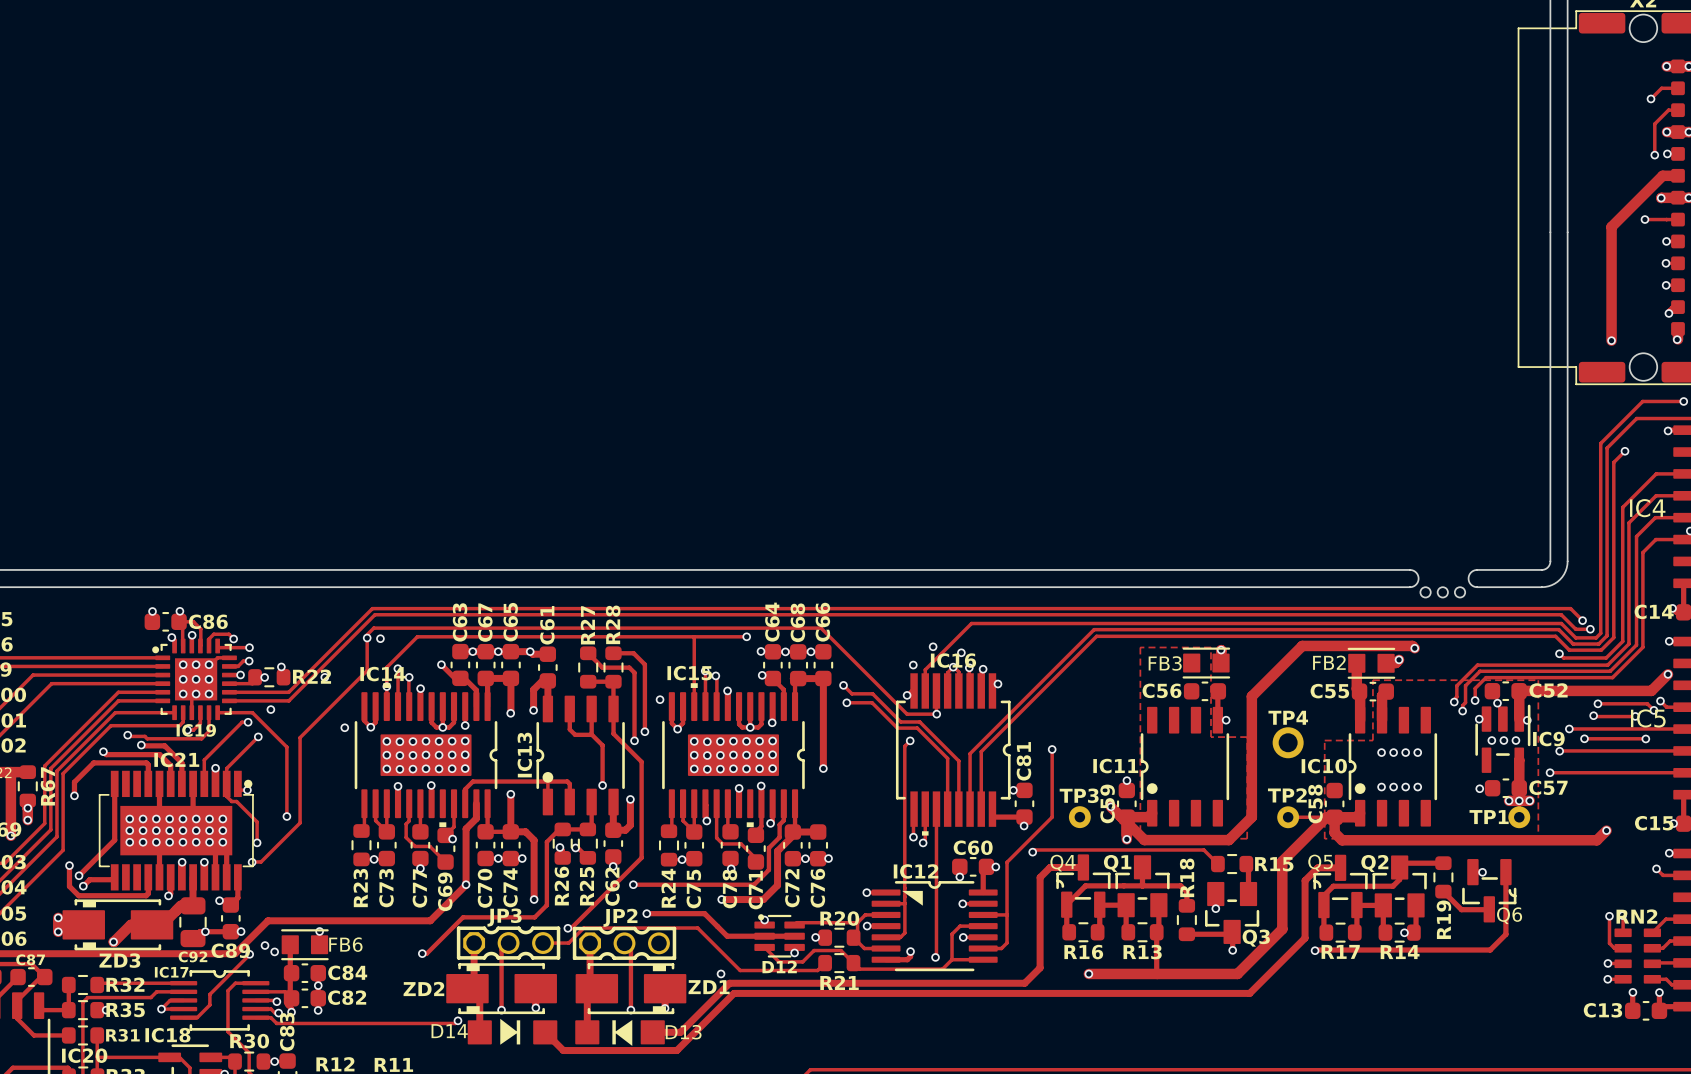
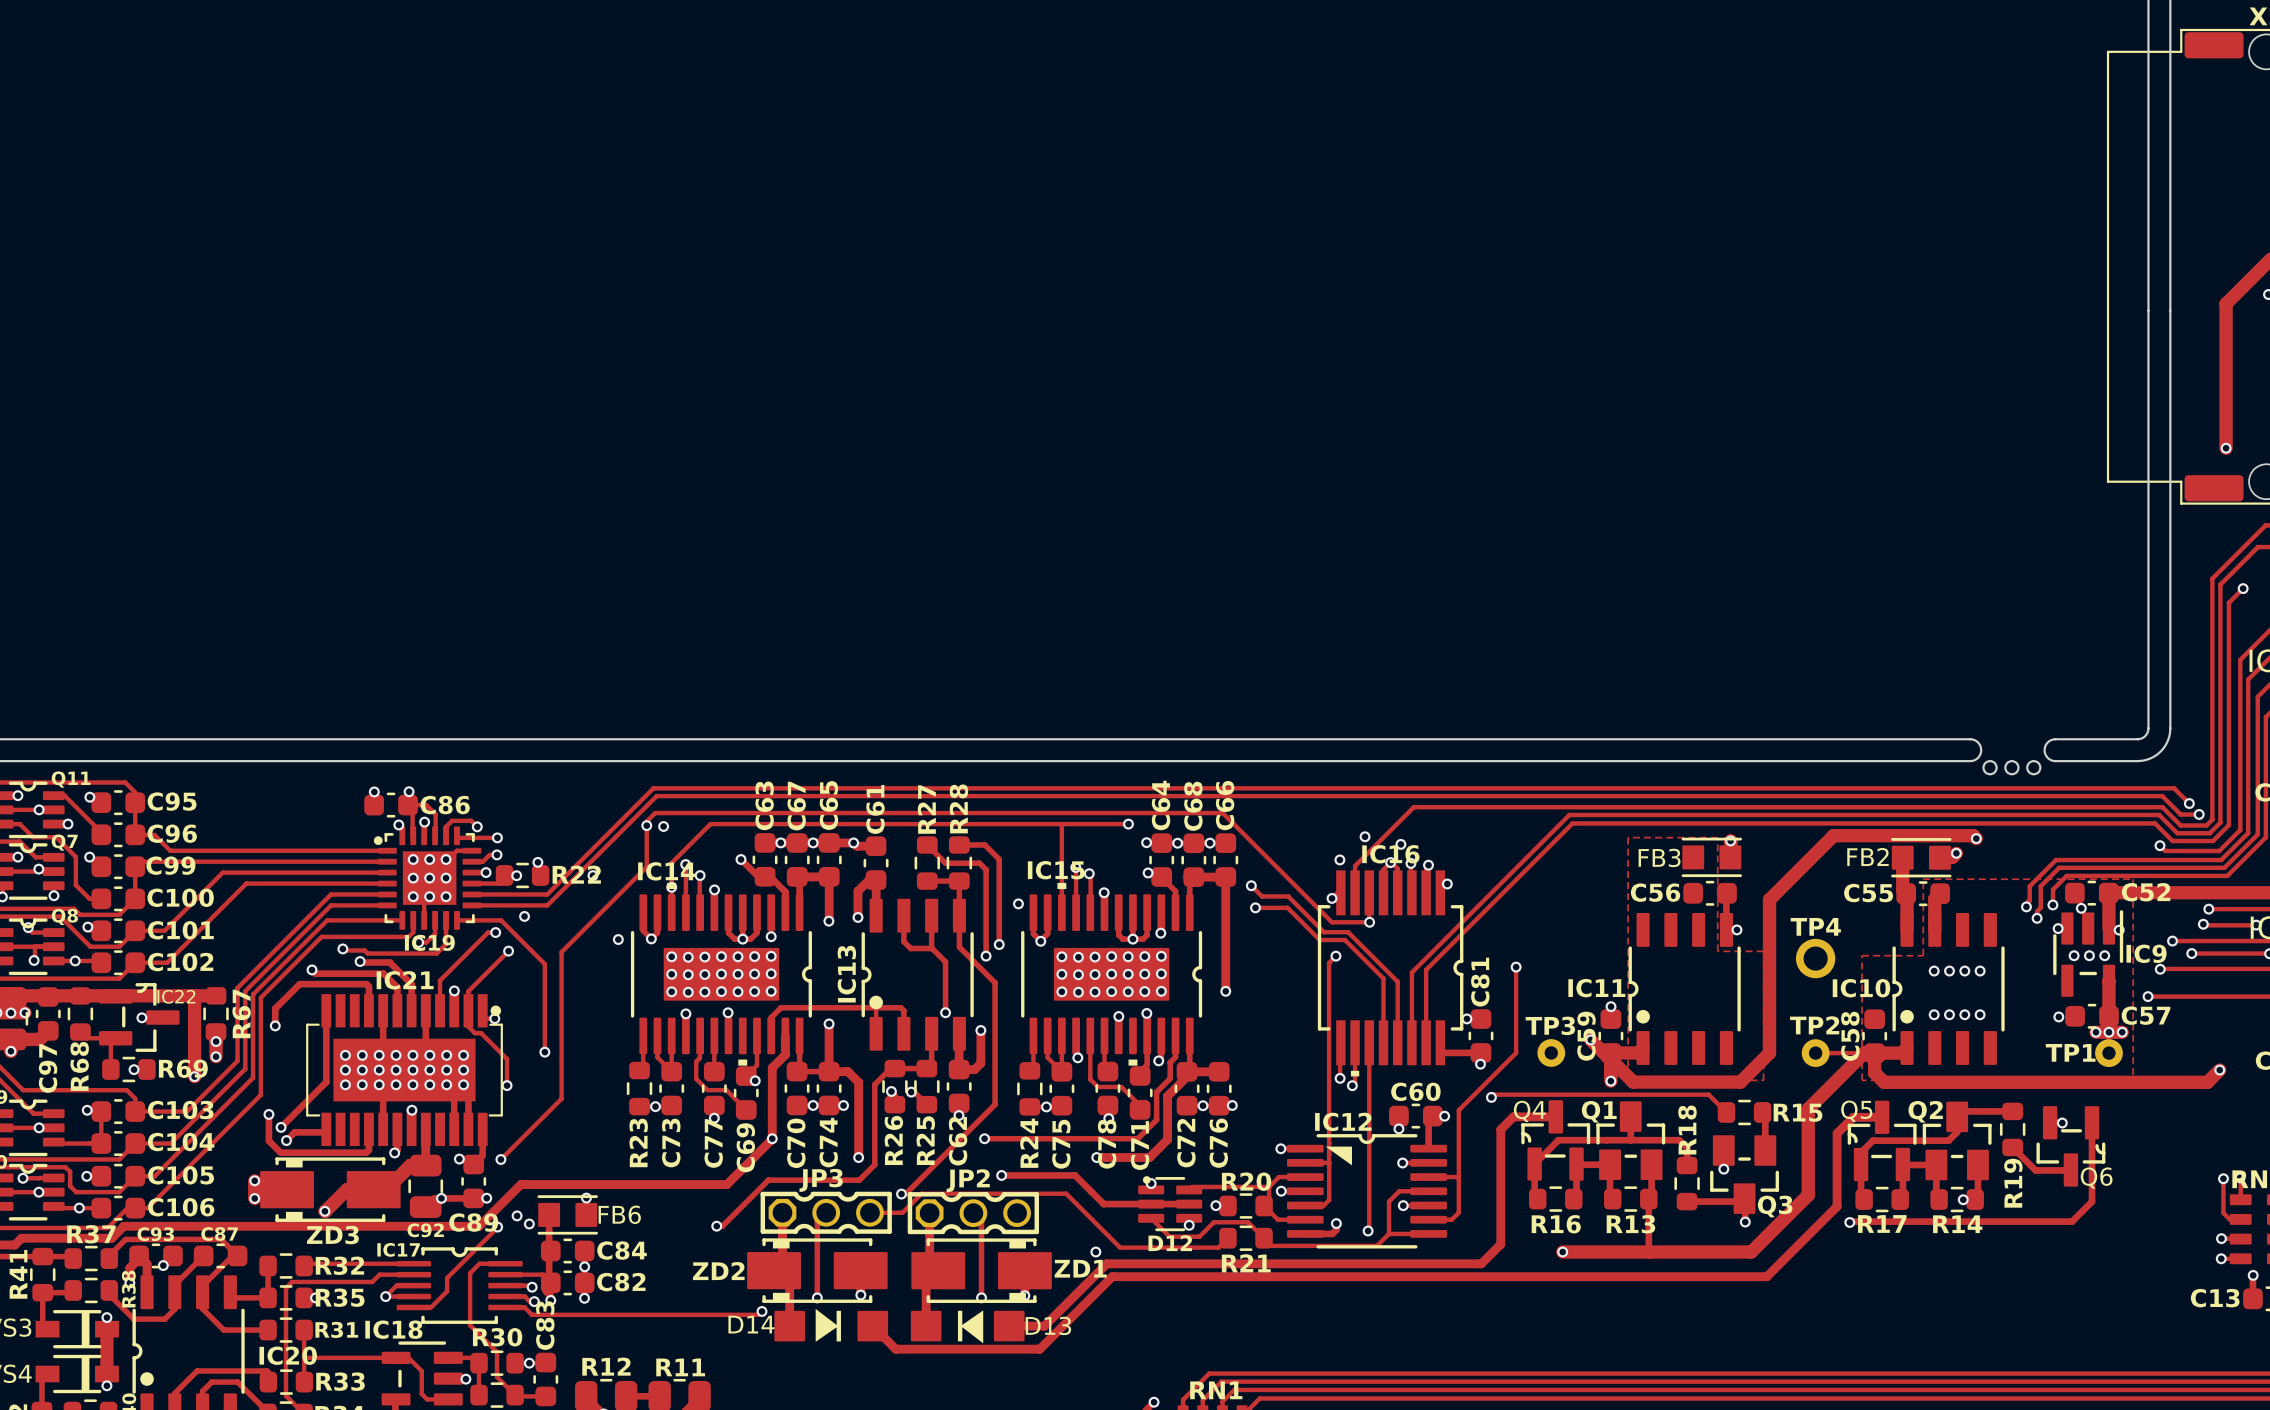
track: (300, 822) (261, 861) (252, 862) -> (561, 1060) (561, 1098) (500, 1159)
via: (204, 862) -> none
via: (252, 862) -> none
via: none -> (500, 1159)

